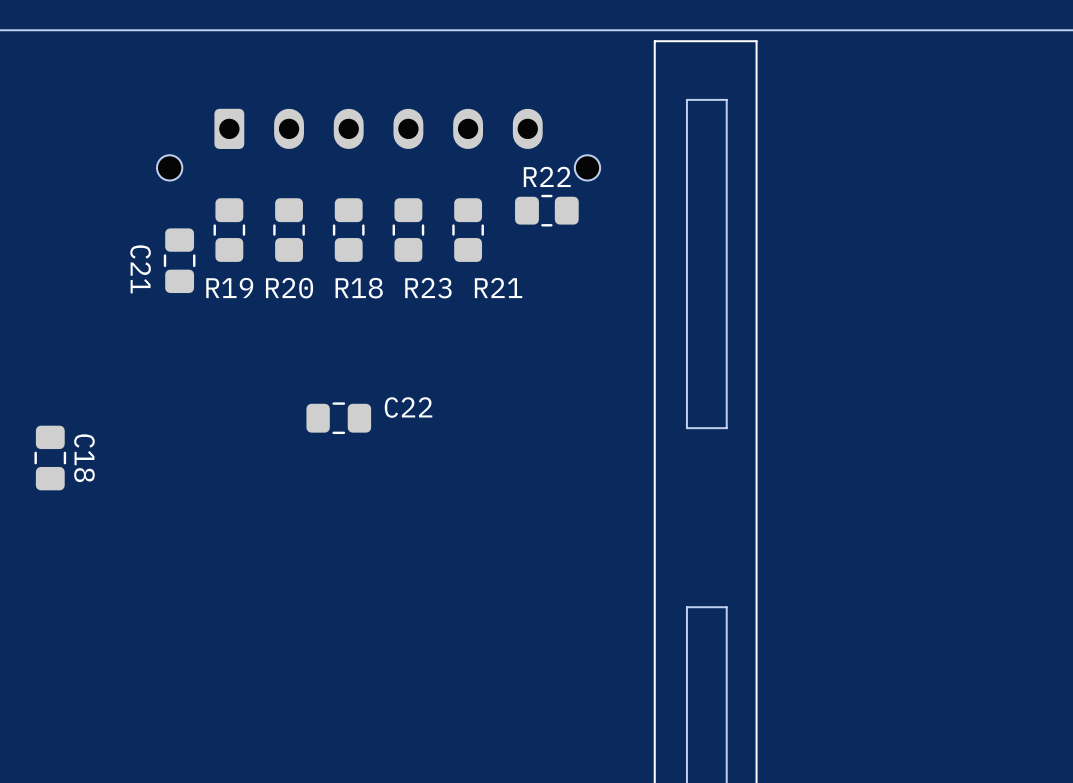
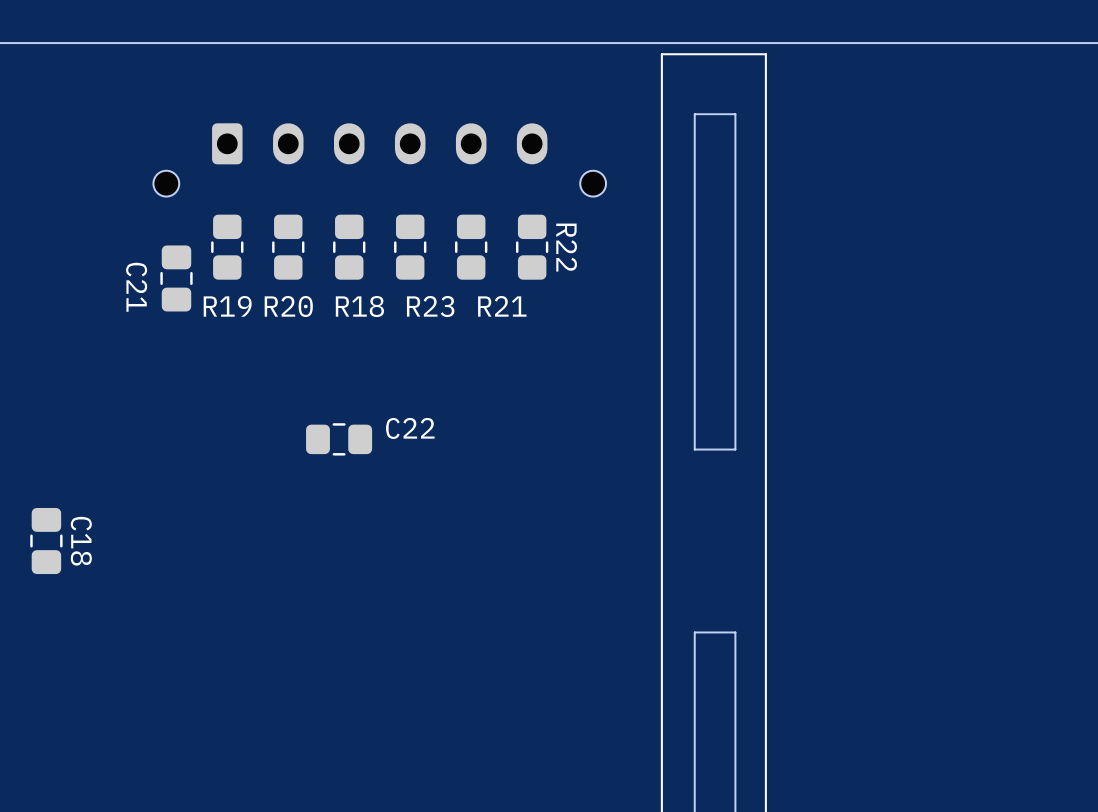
R22 rotation: 0° (546, 210) -> 90° clockwise (532, 247)
C18 position: (50, 458) -> (46, 541)

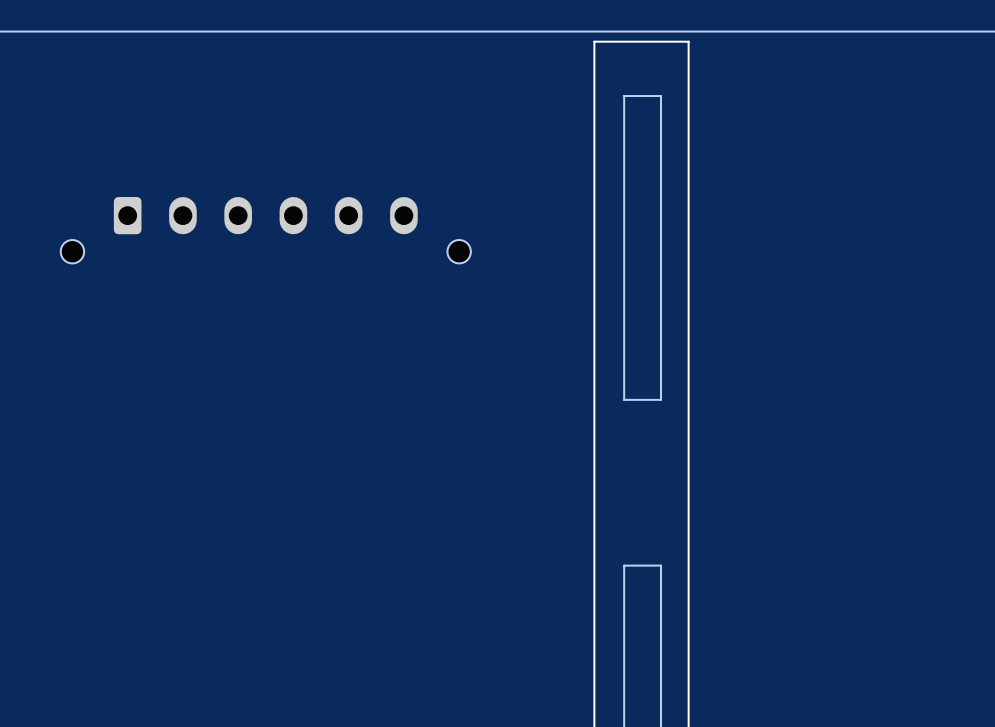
part: (379, 159) -> none
R19: (227, 247) -> none
R20: (288, 247) -> none
R18: (349, 247) -> none
R23: (410, 247) -> none
R21: (471, 247) -> none
R22: (532, 247) -> none
part: none -> (265, 230)
C21: (176, 278) -> none
C22: (339, 439) -> none
C18: (46, 541) -> none

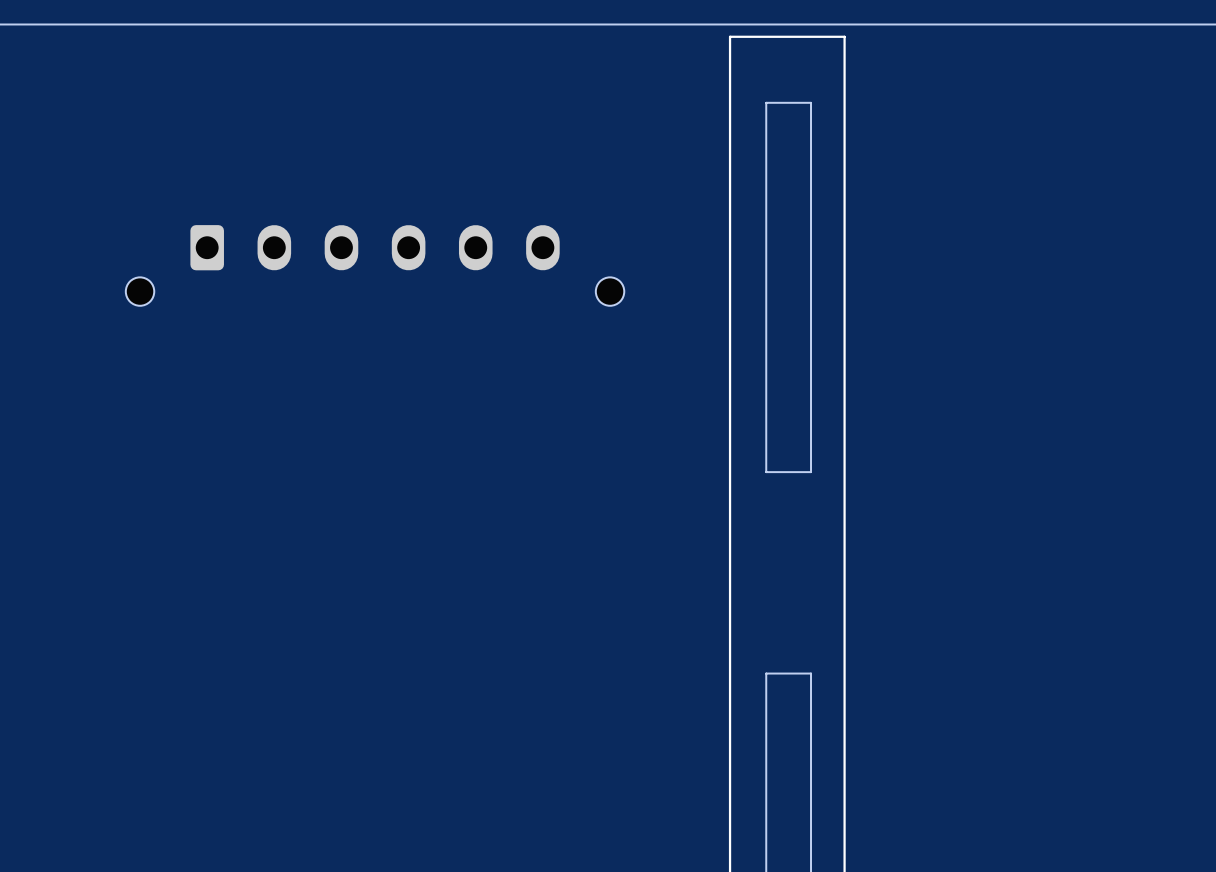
part position: (265, 230) -> (375, 265)

